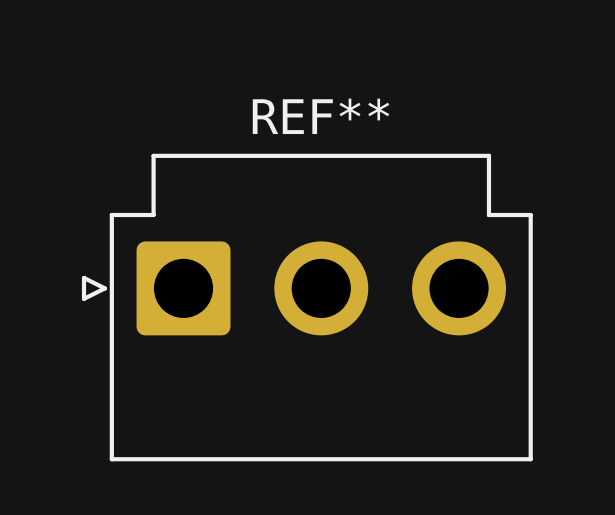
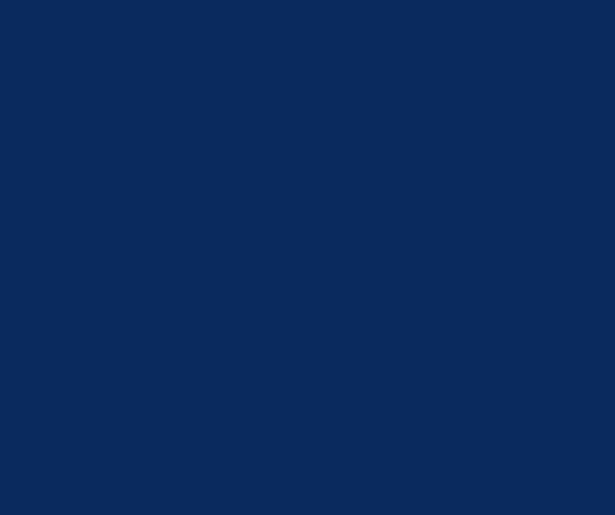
REF**: (307, 307) -> none

